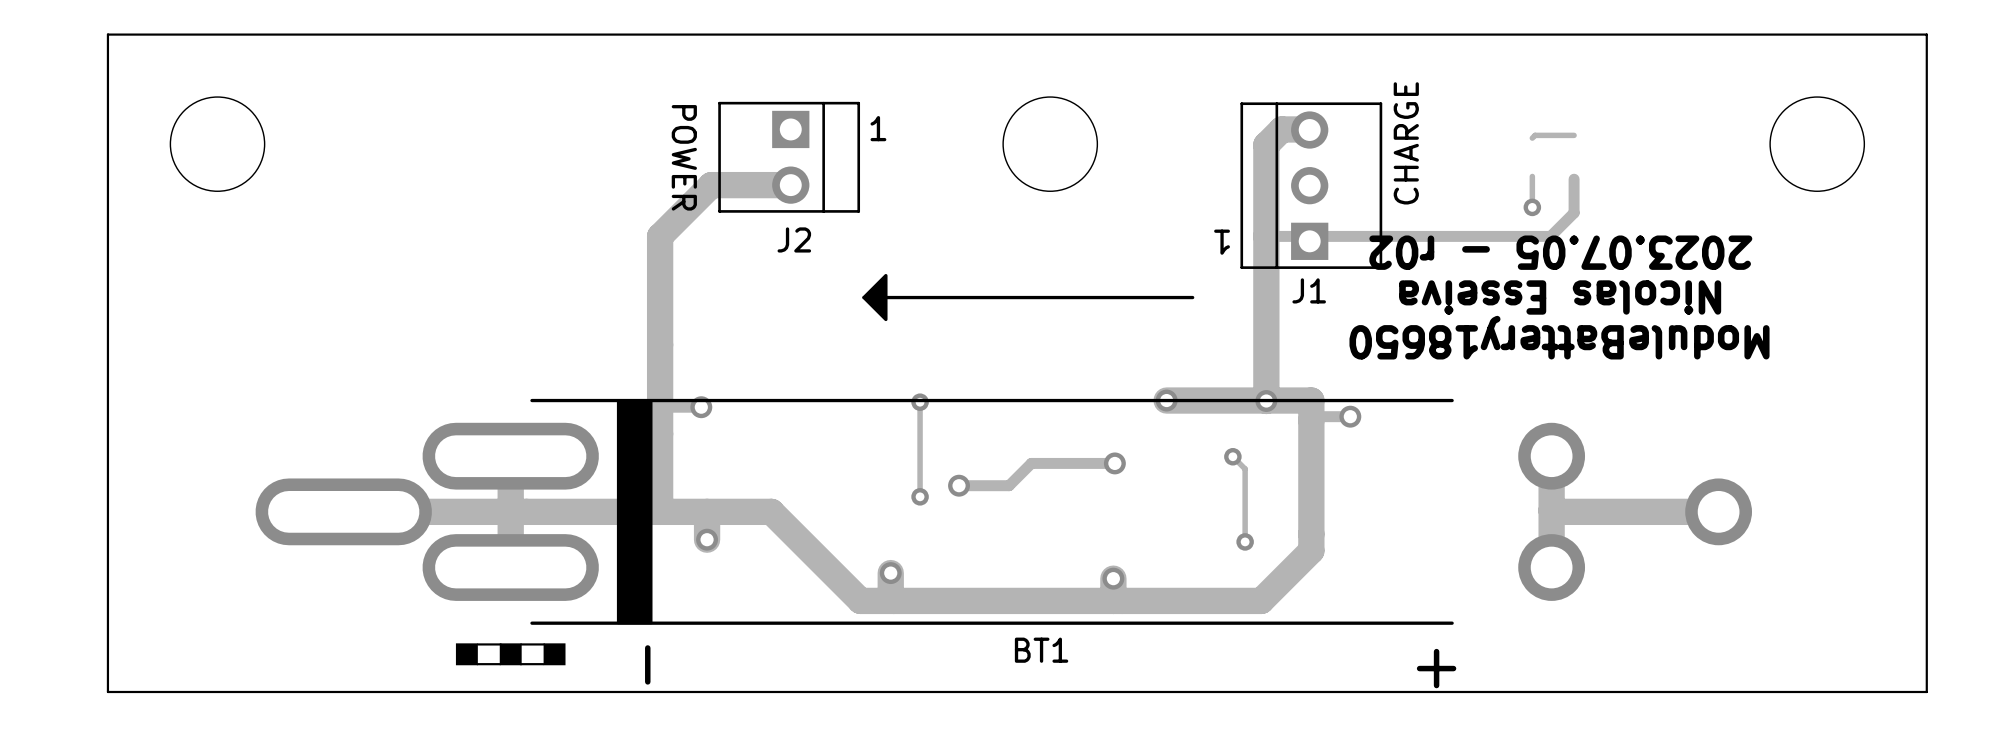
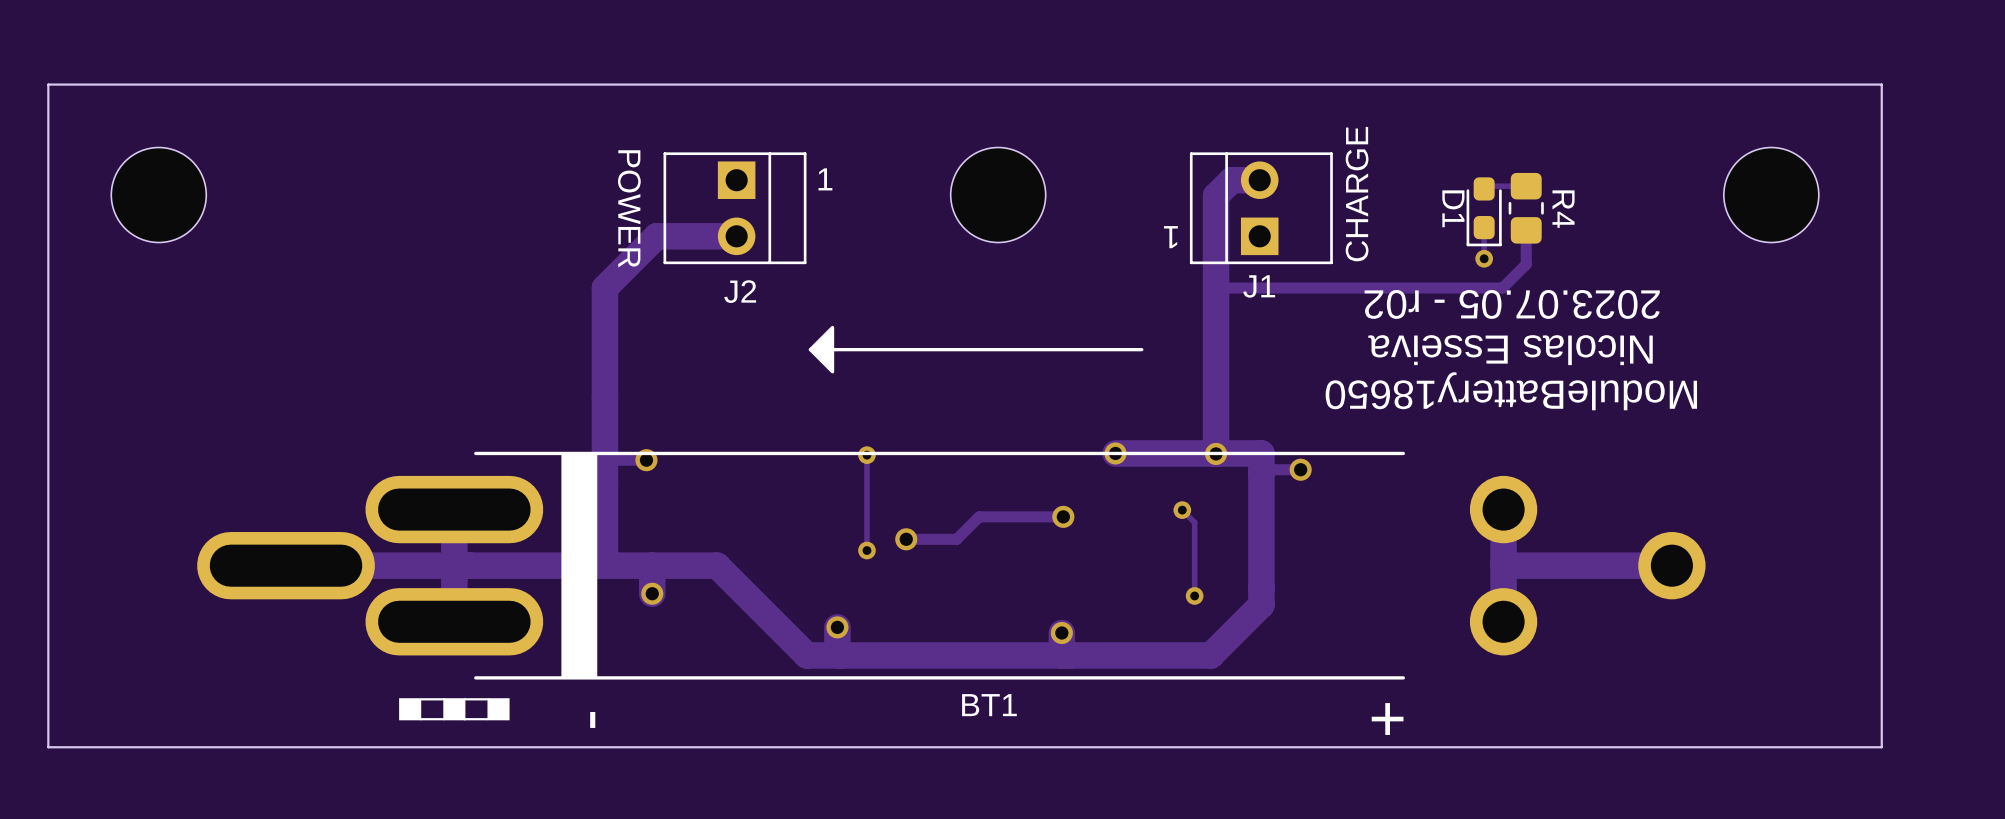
J1 footprint: [1240, 102, 1383, 269] -> [1189, 152, 1333, 265]
R4: none -> (1526, 208)
D1: none -> (1484, 211)

